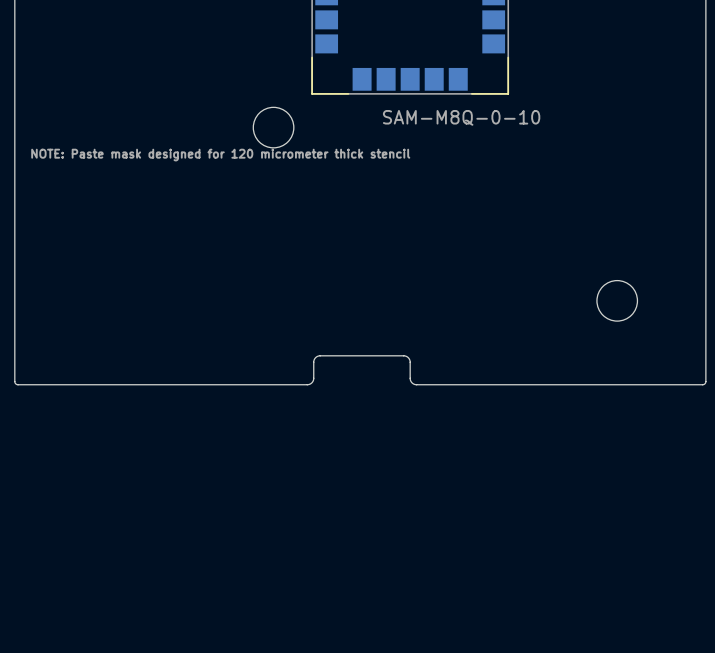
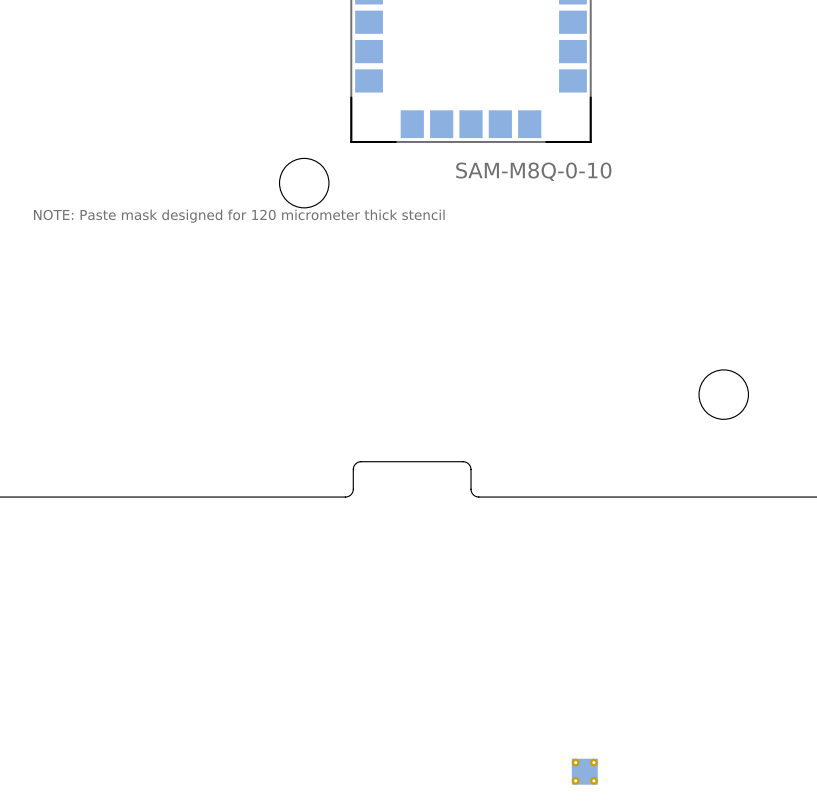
part: none -> (584, 771)

